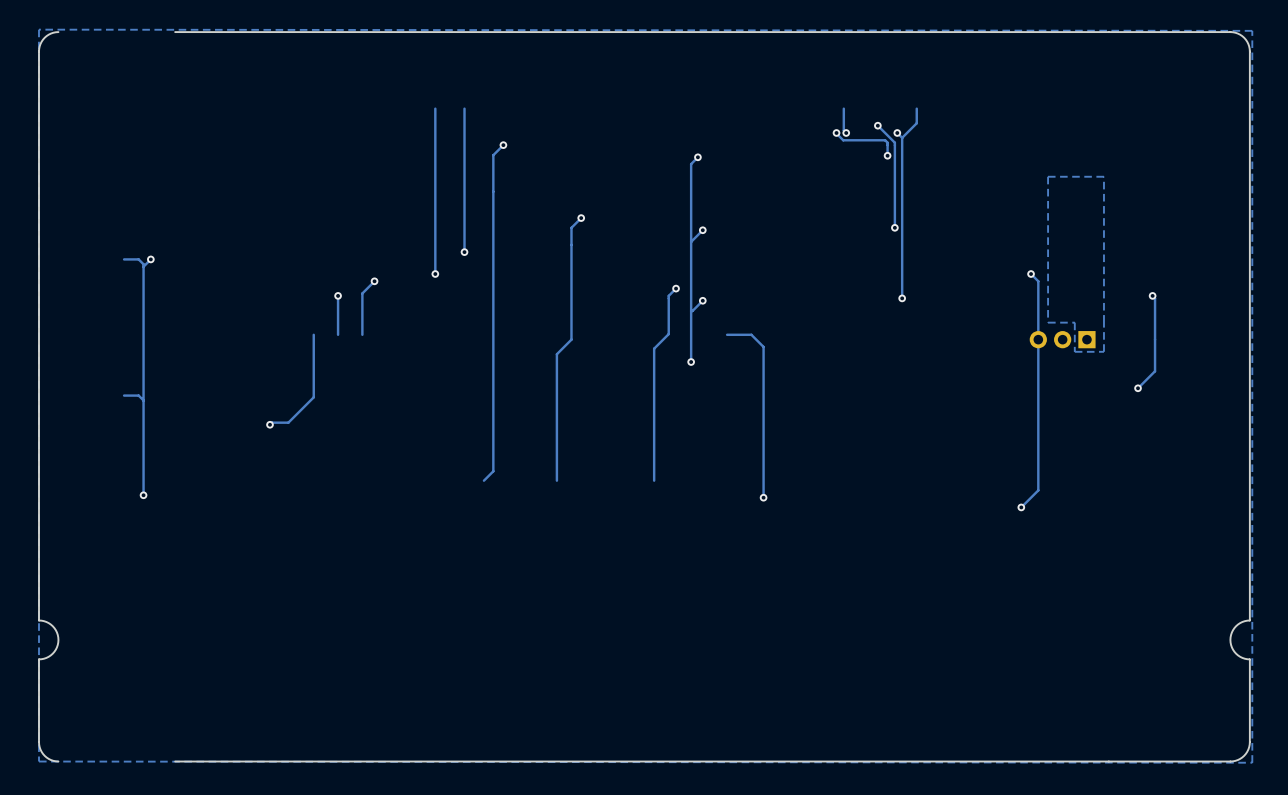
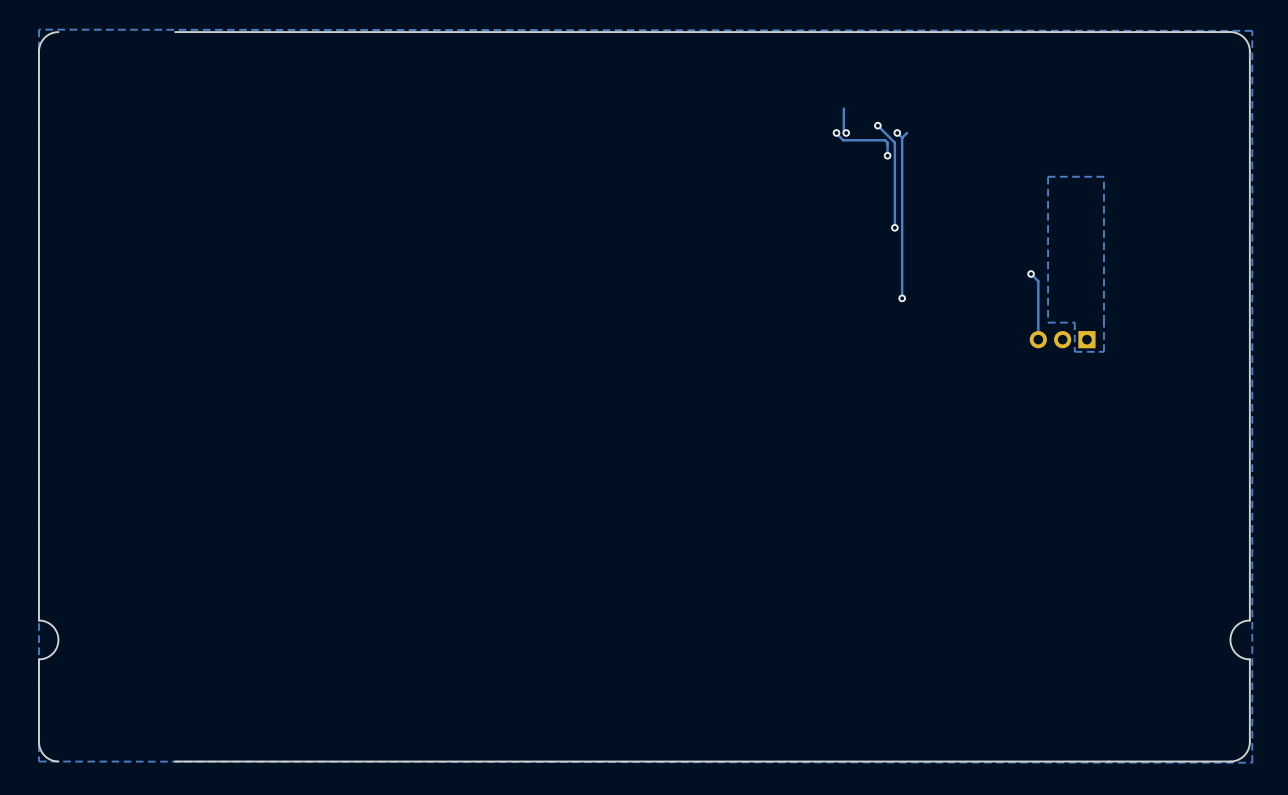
track: (435, 108) (435, 274) -> none
track: (464, 108) (464, 252) -> none
track: (916, 108) (916, 123) (907, 132) -> none
track: (503, 145) (493, 155) (493, 471) (483, 480) -> none
via: (503, 145) -> none
track: (697, 157) (691, 164) (691, 362) -> none
via: (697, 157) -> none
track: (581, 218) (571, 227) (571, 339) (556, 354) (556, 480) -> none
via: (581, 218) -> none
track: (702, 230) (691, 241) -> none
via: (702, 230) -> none
via: (464, 252) -> none
track: (124, 259) (138, 259) (143, 264) (143, 495) -> none
track: (150, 259) (143, 266) -> none
via: (150, 259) -> none
via: (435, 274) -> none
track: (374, 281) (362, 293) (362, 334) -> none
via: (374, 281) -> none
track: (676, 288) (668, 295) (668, 334) (654, 348) (654, 480) -> none
via: (676, 288) -> none
track: (338, 295) (338, 334) -> none
via: (338, 295) -> none
track: (1152, 295) (1155, 298) (1155, 371) (1138, 388) -> none
via: (1152, 295) -> none
track: (702, 300) (691, 310) -> none
via: (702, 300) -> none
track: (313, 334) (313, 397) (288, 422) (272, 422) (269, 424) -> none
track: (727, 334) (751, 334) (763, 346) (763, 497) -> none
track: (1038, 339) (1038, 490) (1021, 507) -> none
via: (691, 362) -> none
via: (1138, 388) -> none
track: (124, 395) (138, 395) (143, 400) -> none
via: (269, 424) -> none
via: (143, 495) -> none
via: (763, 497) -> none
via: (1021, 507) -> none

